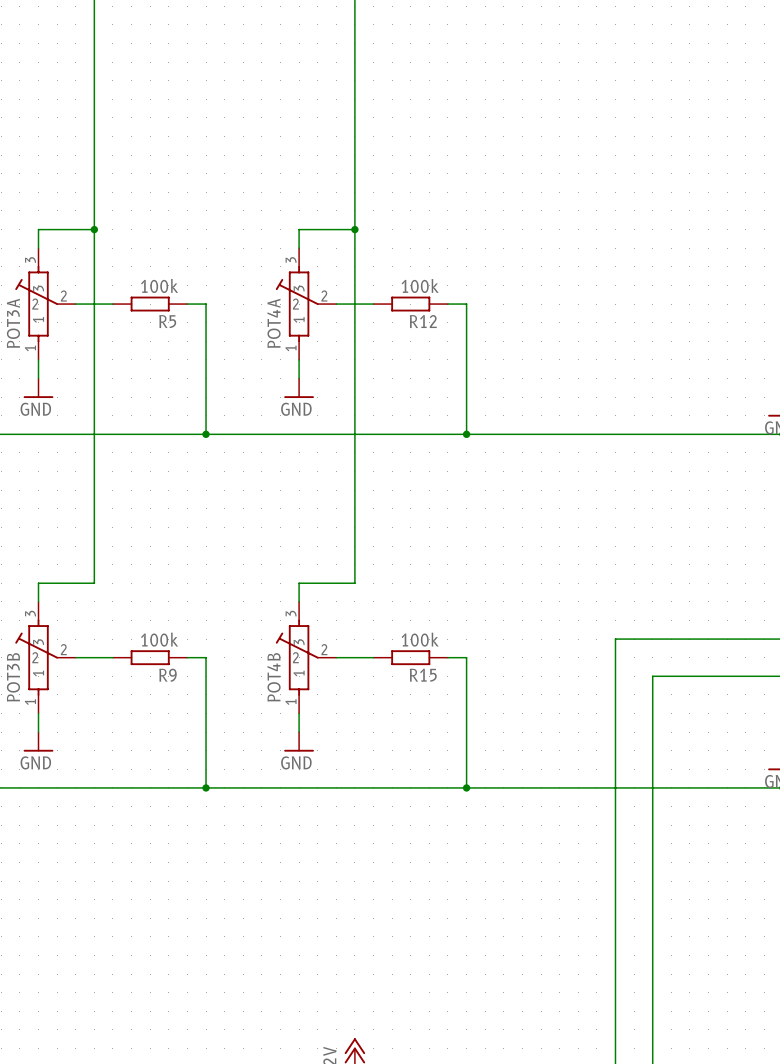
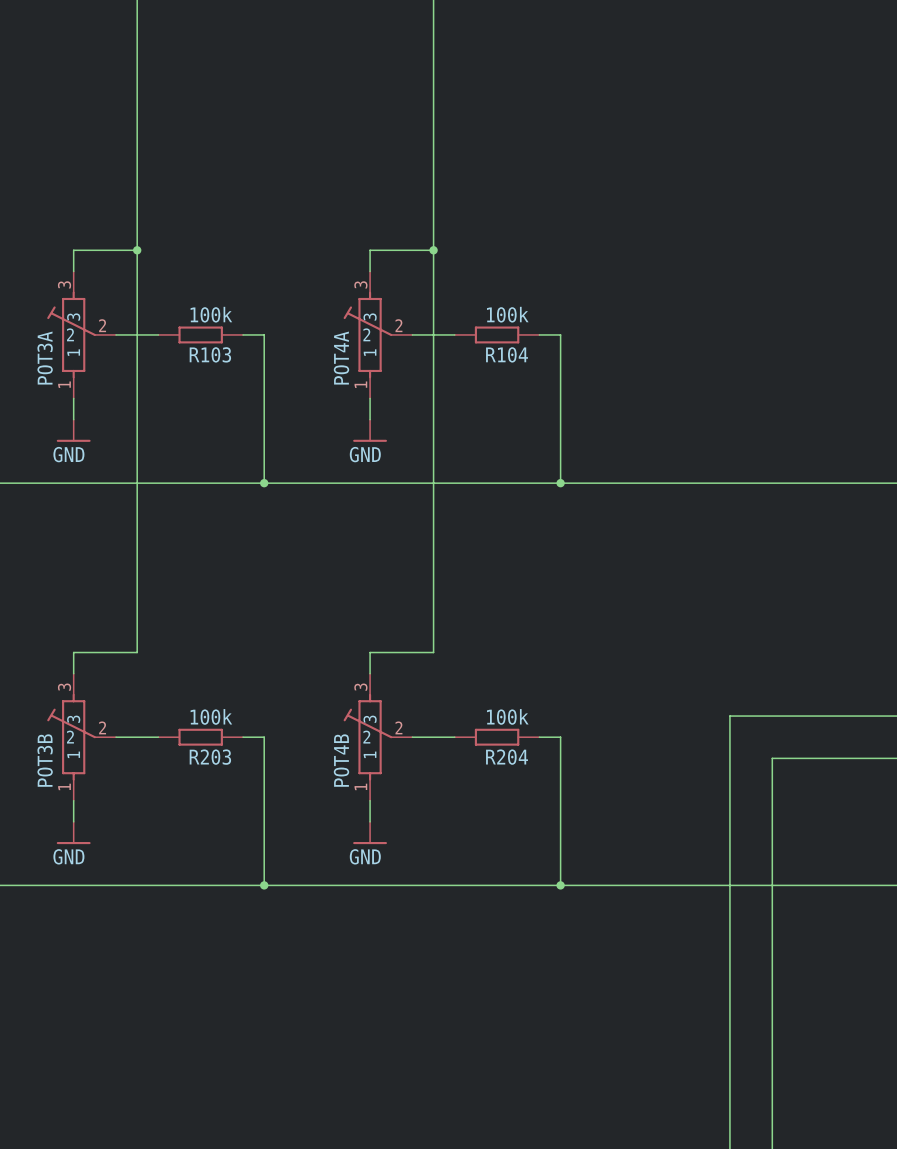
R5 name: R5 (167, 321) -> R103 (210, 354)
R12 name: R12 (423, 321) -> R104 (507, 354)
R9 name: R9 (167, 675) -> R203 (210, 757)
R15 name: R15 (423, 675) -> R204 (507, 757)

